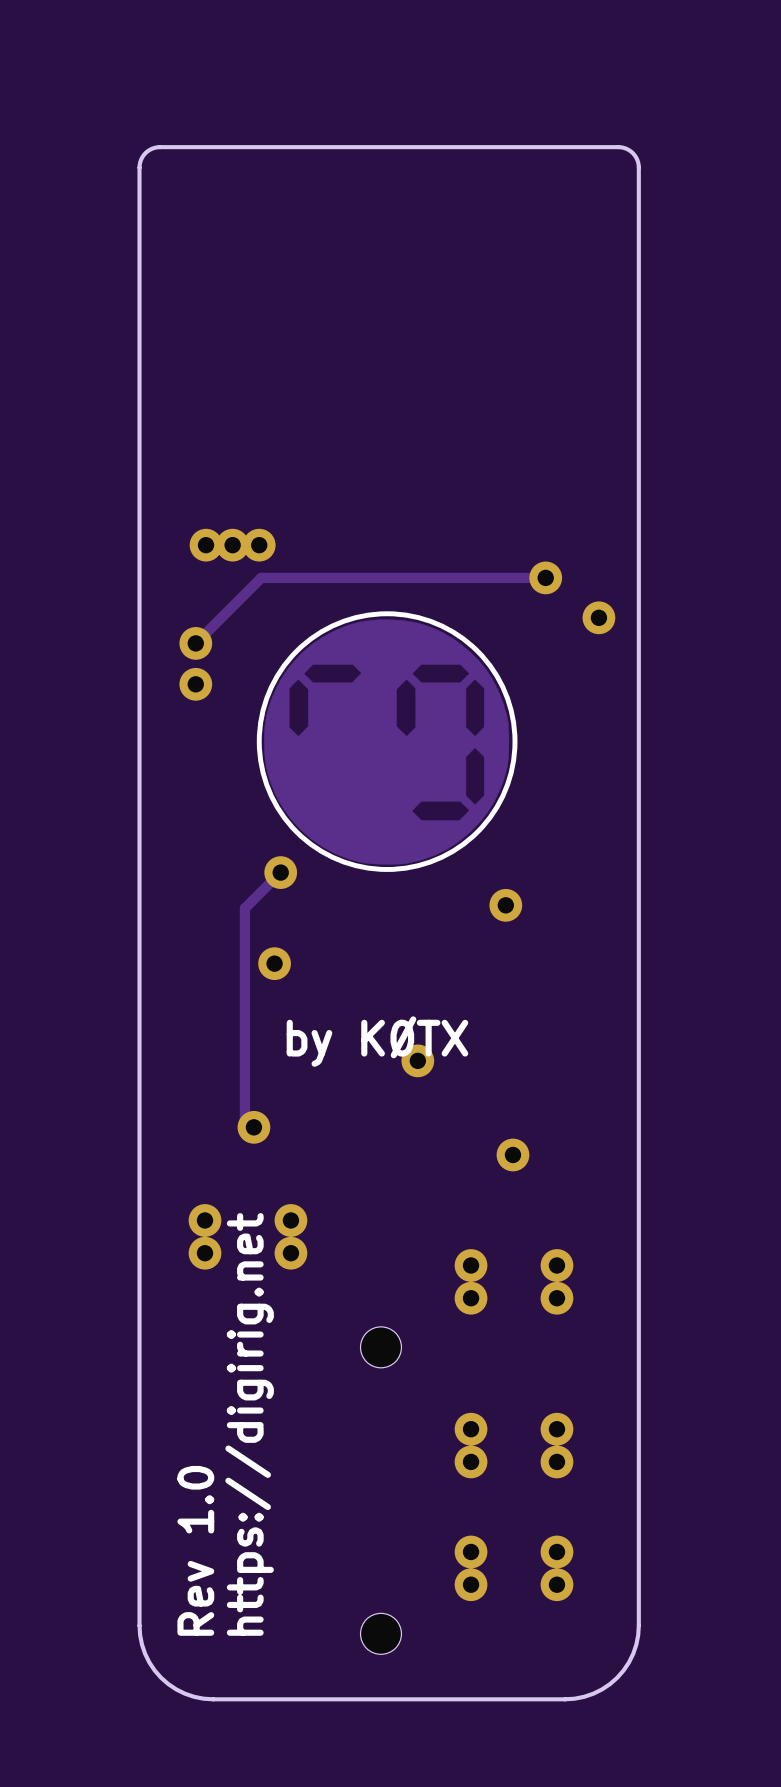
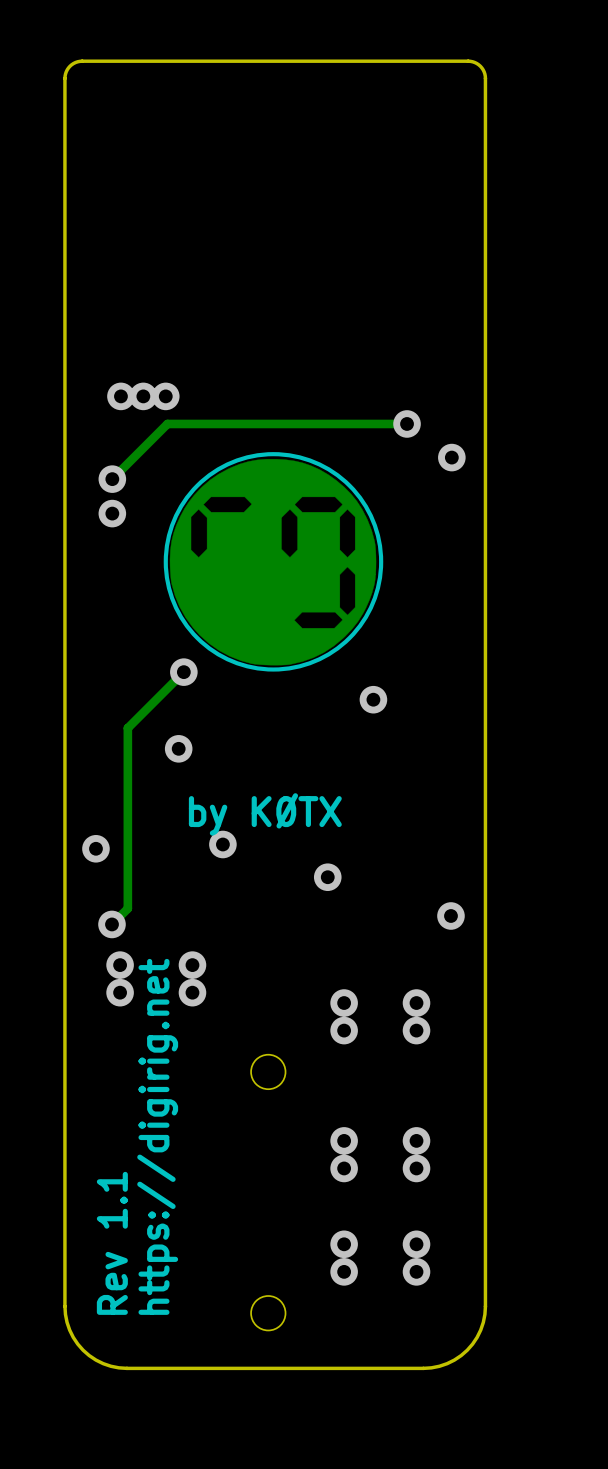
track: (244, 908) (244, 1118) (253, 1127) -> (153, 702) (127, 728) (127, 908) (111, 924)
via: (417, 1060) -> none
via: none -> (222, 844)
via: none -> (95, 848)
via: none -> (327, 877)
via: (253, 1127) -> none
via: (512, 1154) -> none
via: none -> (450, 915)
via: none -> (111, 924)
text: Rev 1.0 (195, 1550) -> Rev 1.1 (112, 1243)

